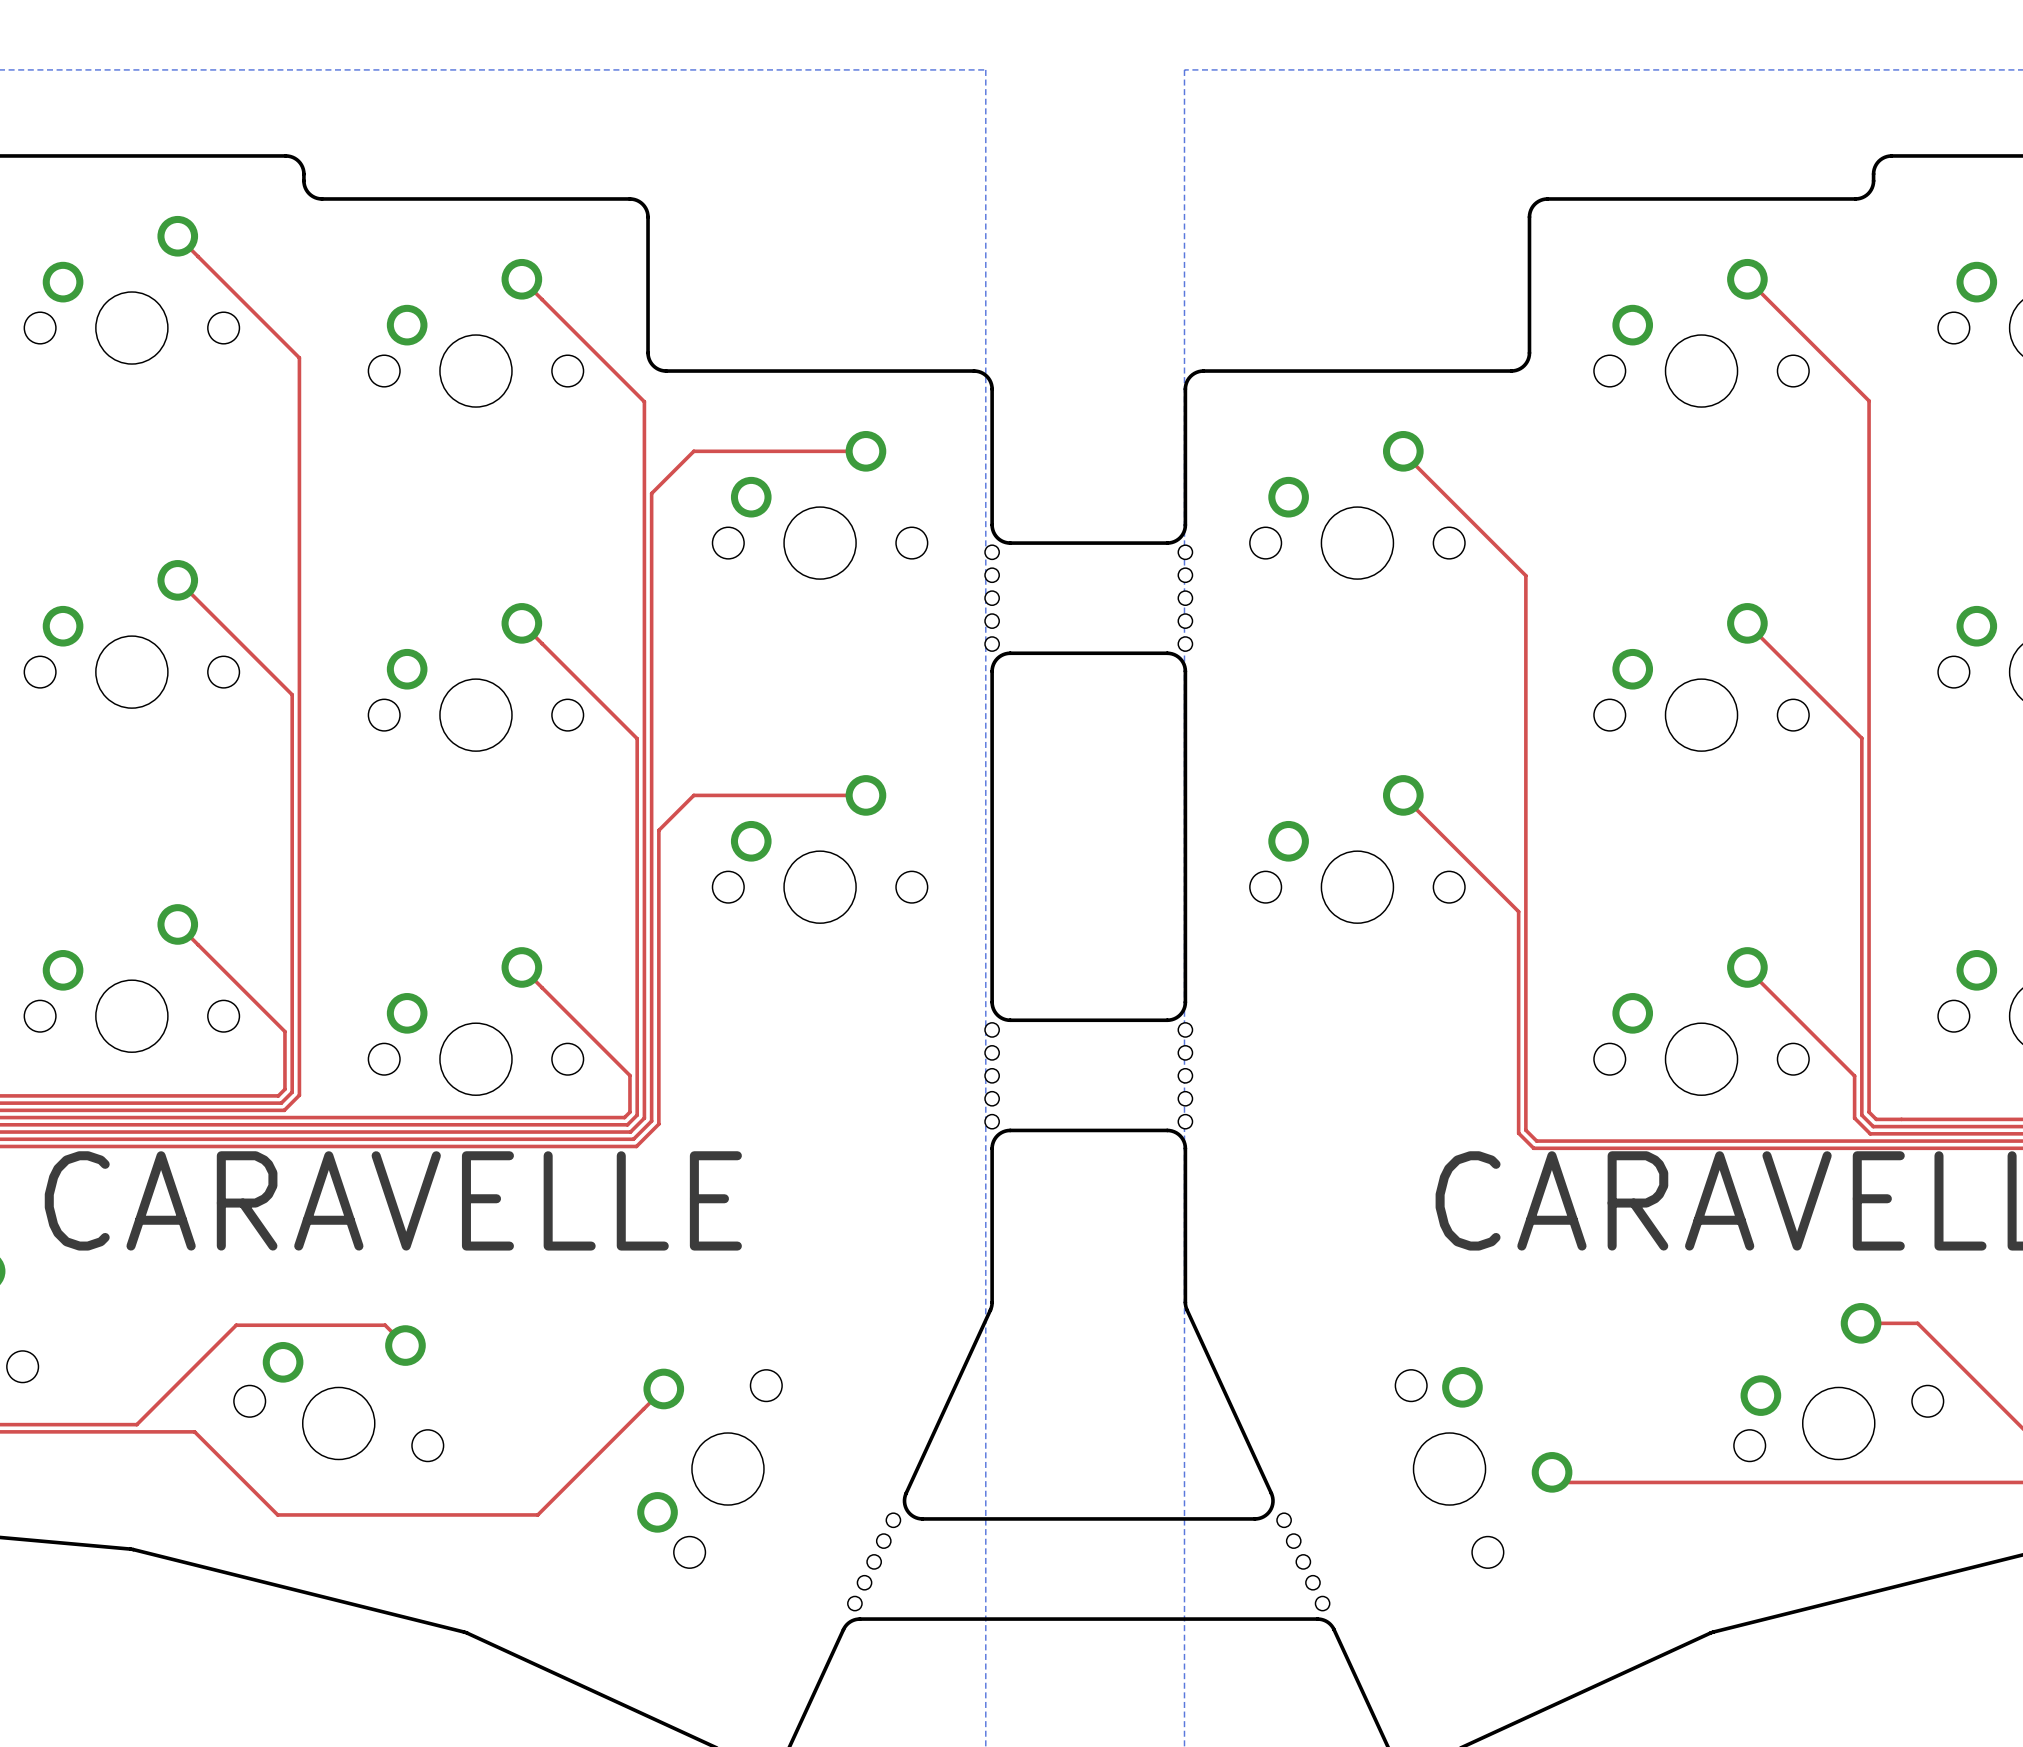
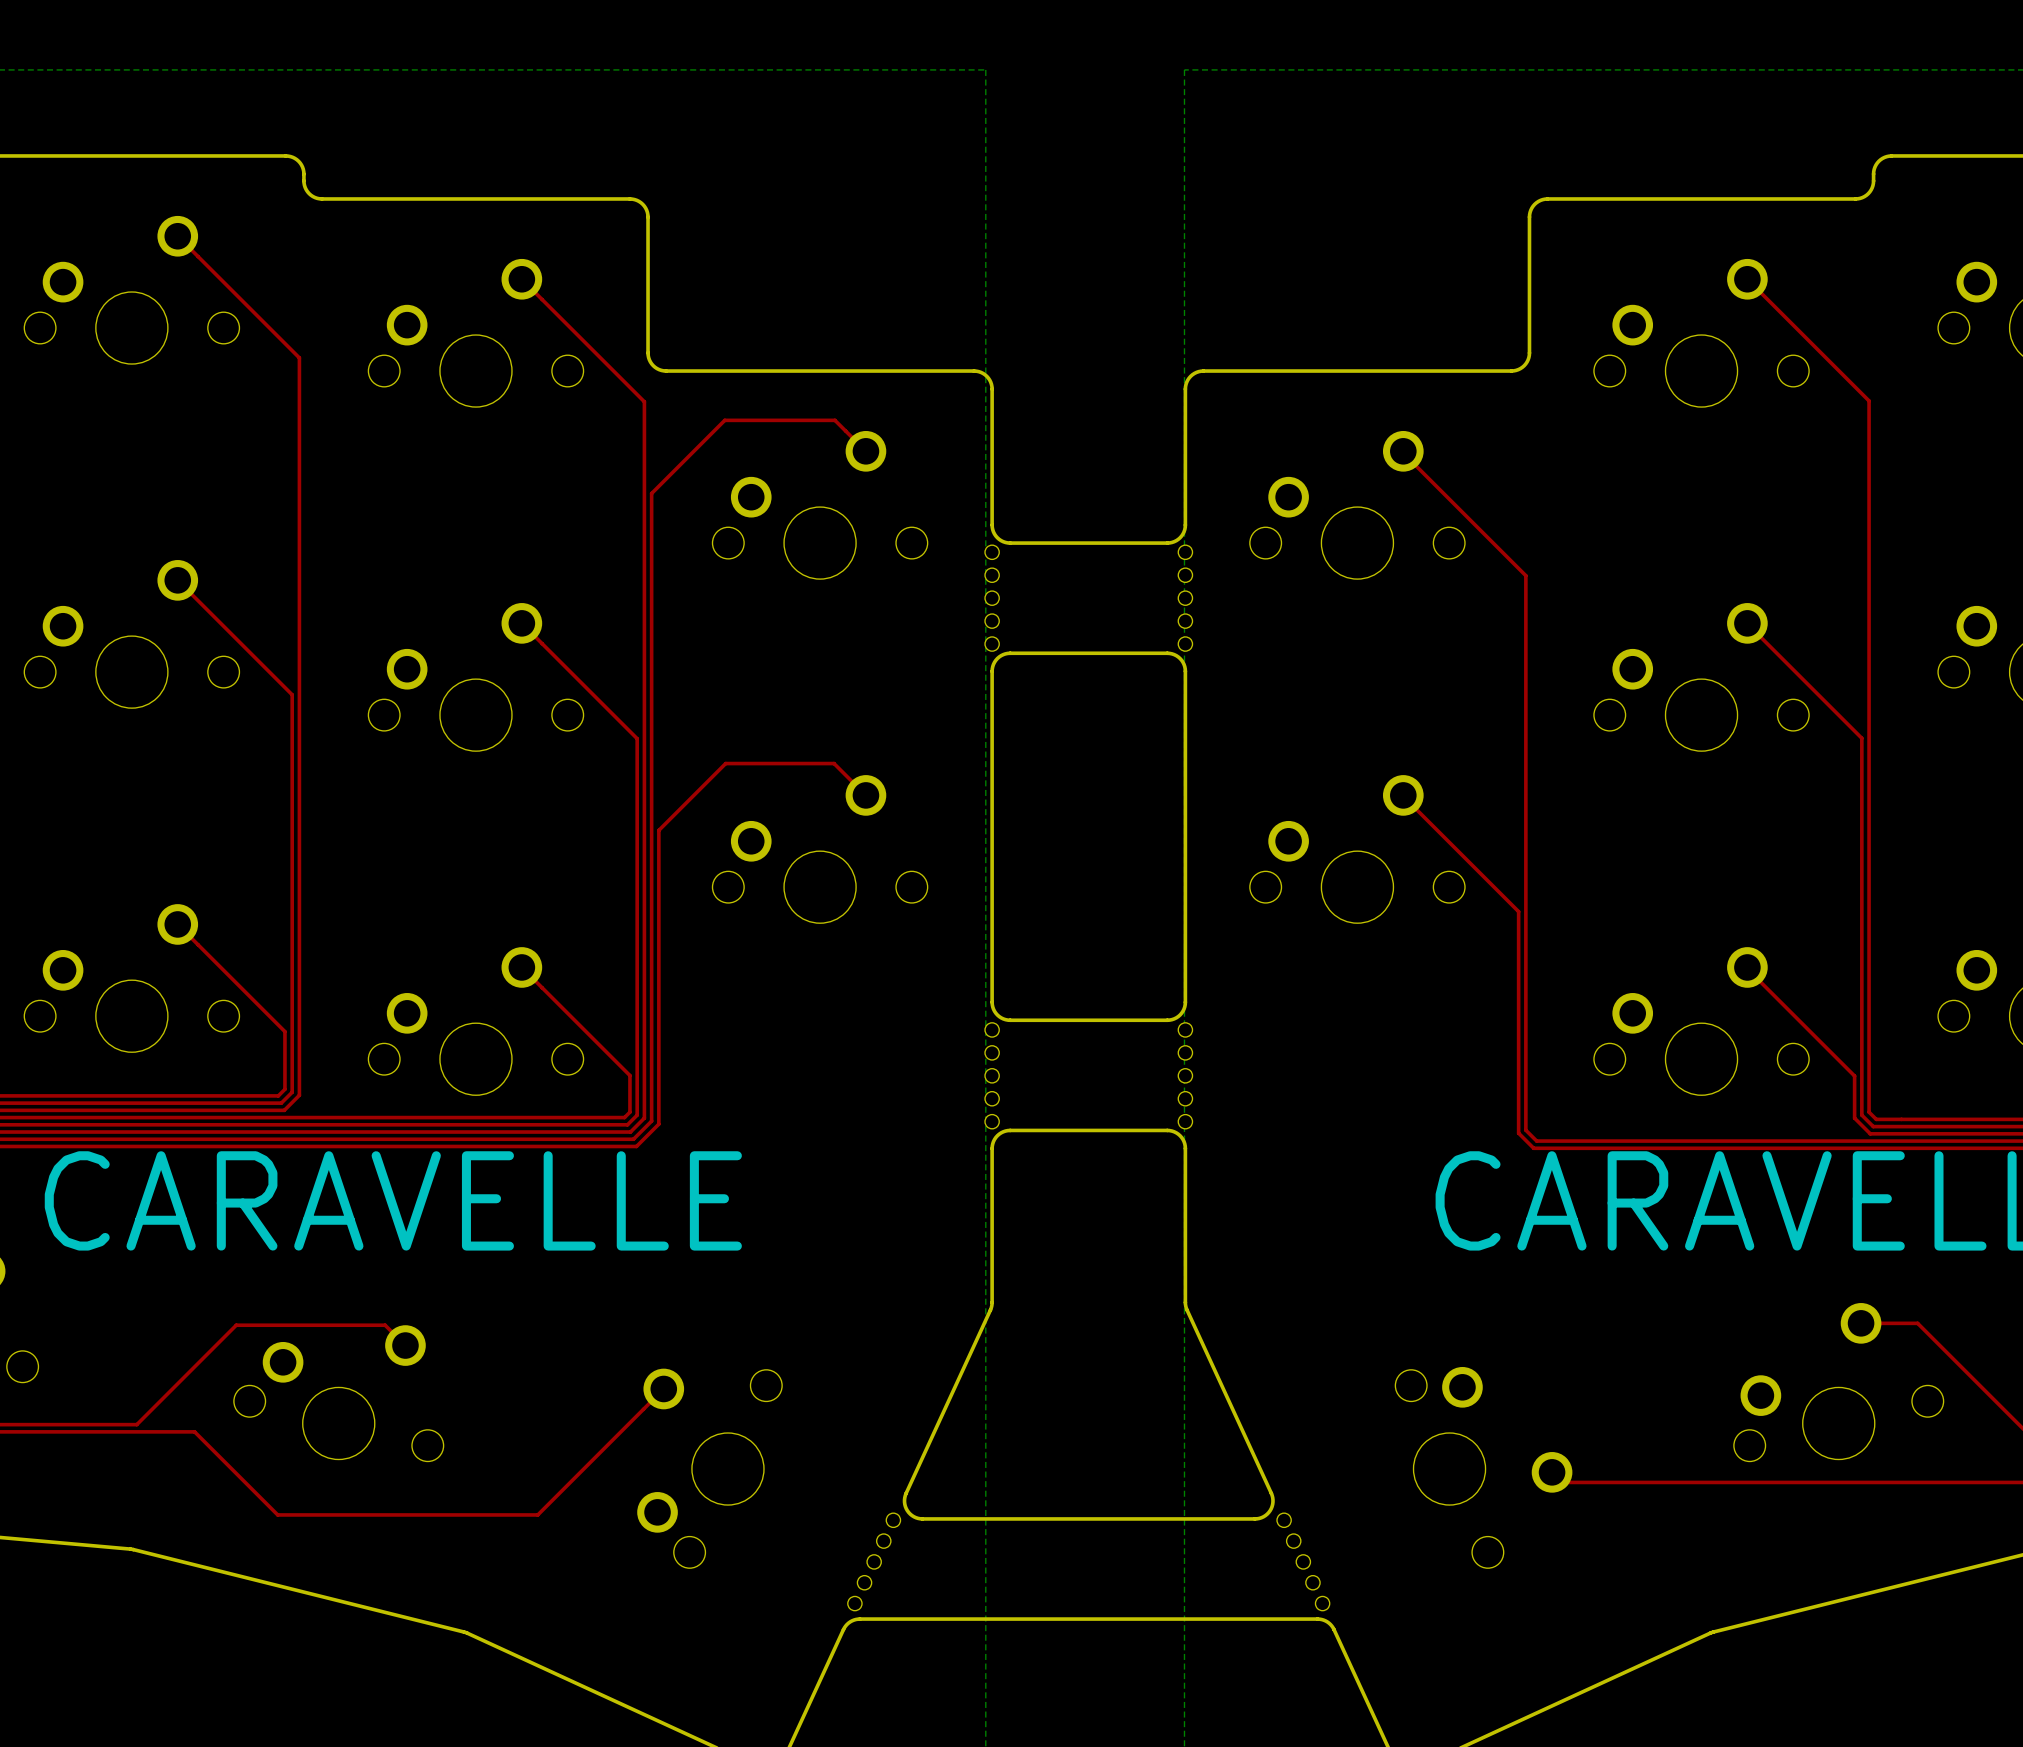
top track: (693, 451) (865, 451) -> (693, 451) (724, 420) (834, 420) (865, 451)
top track: (693, 795) (865, 795) -> (693, 795) (725, 763) (834, 763) (865, 795)

